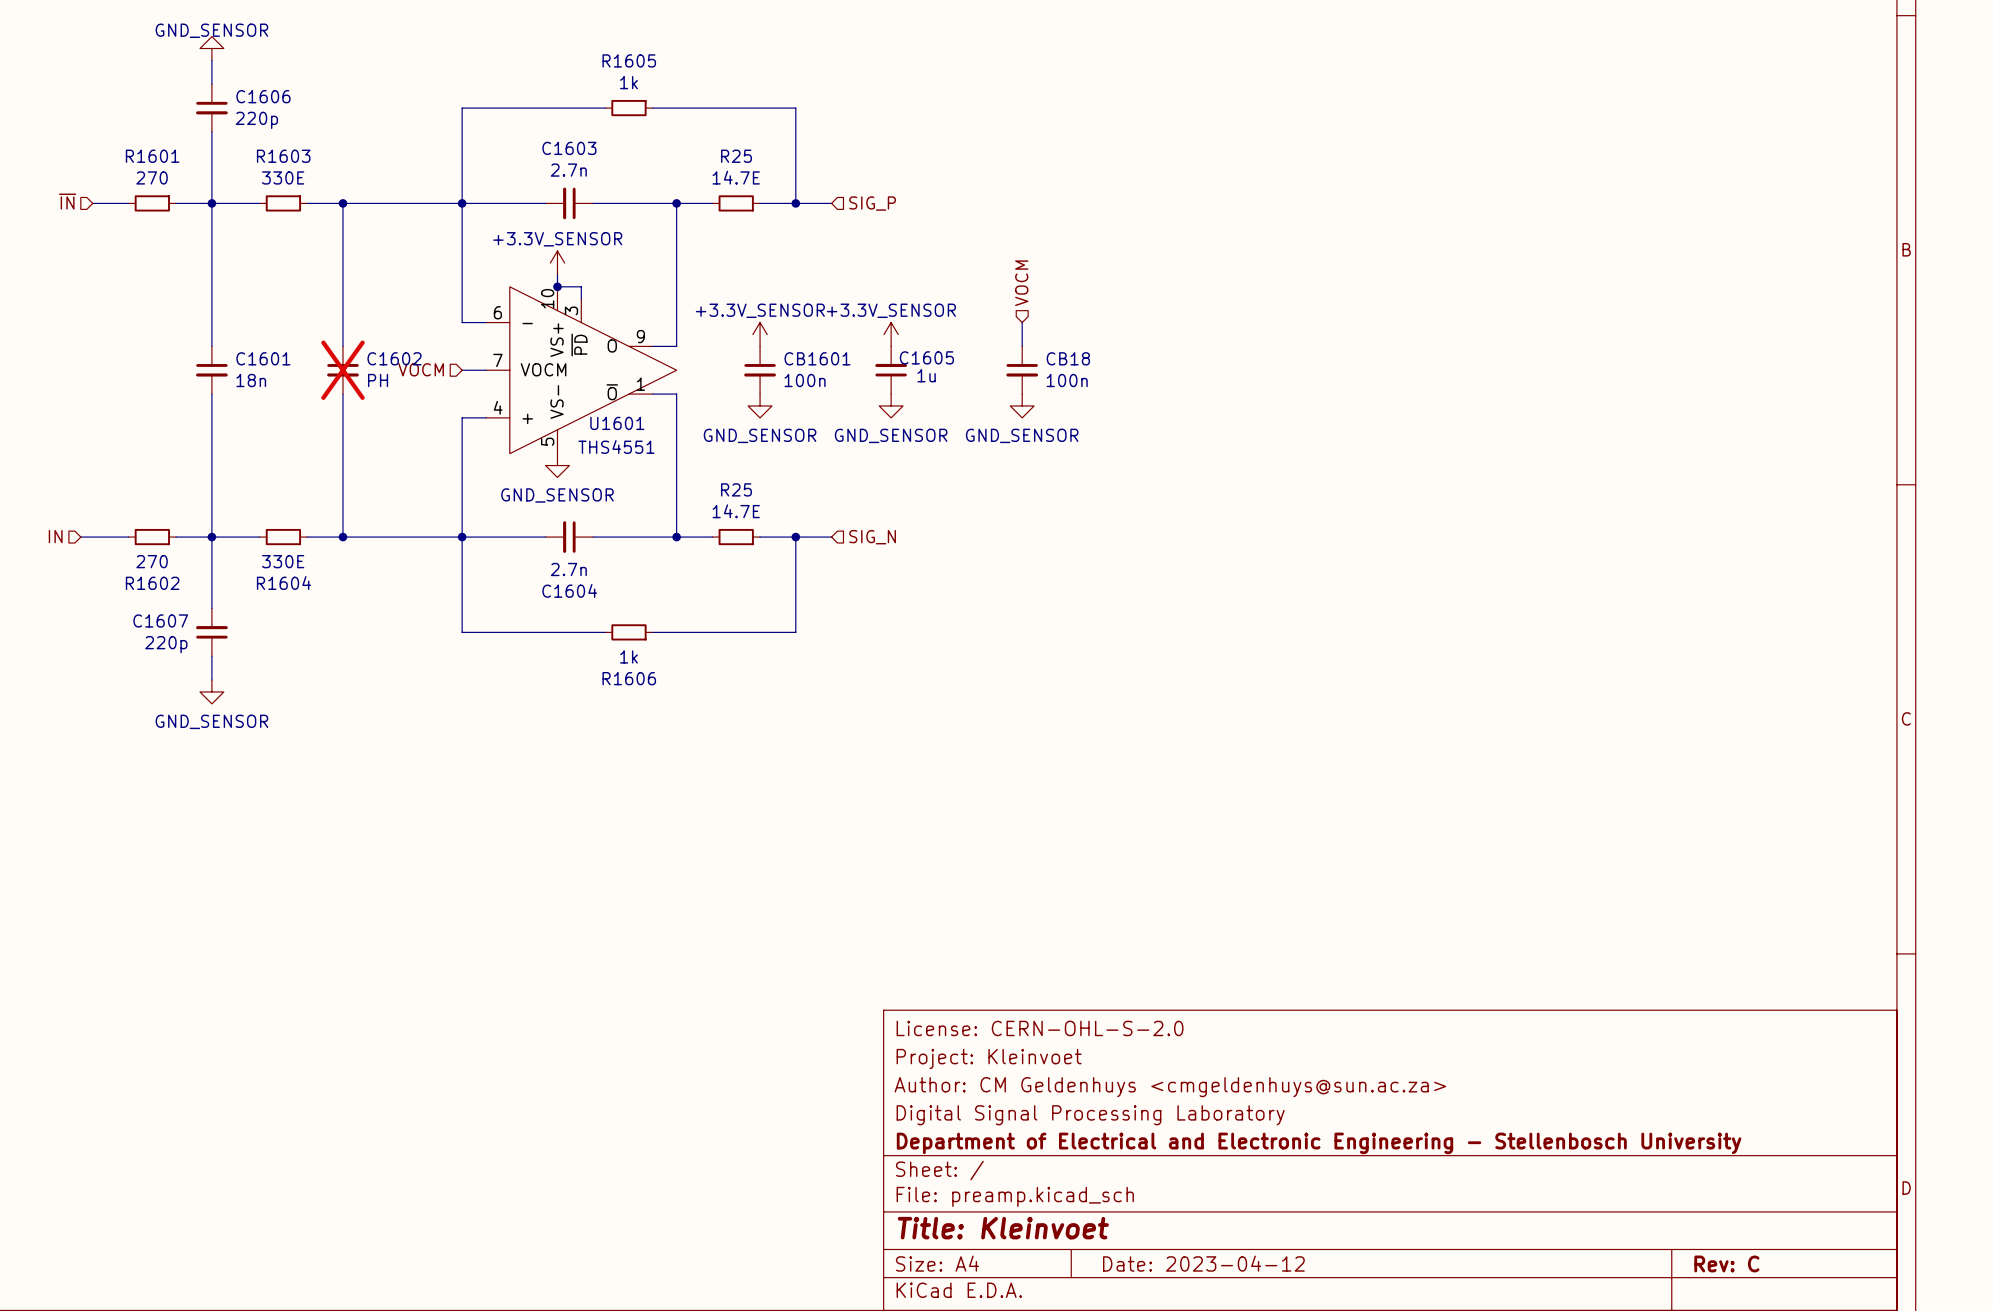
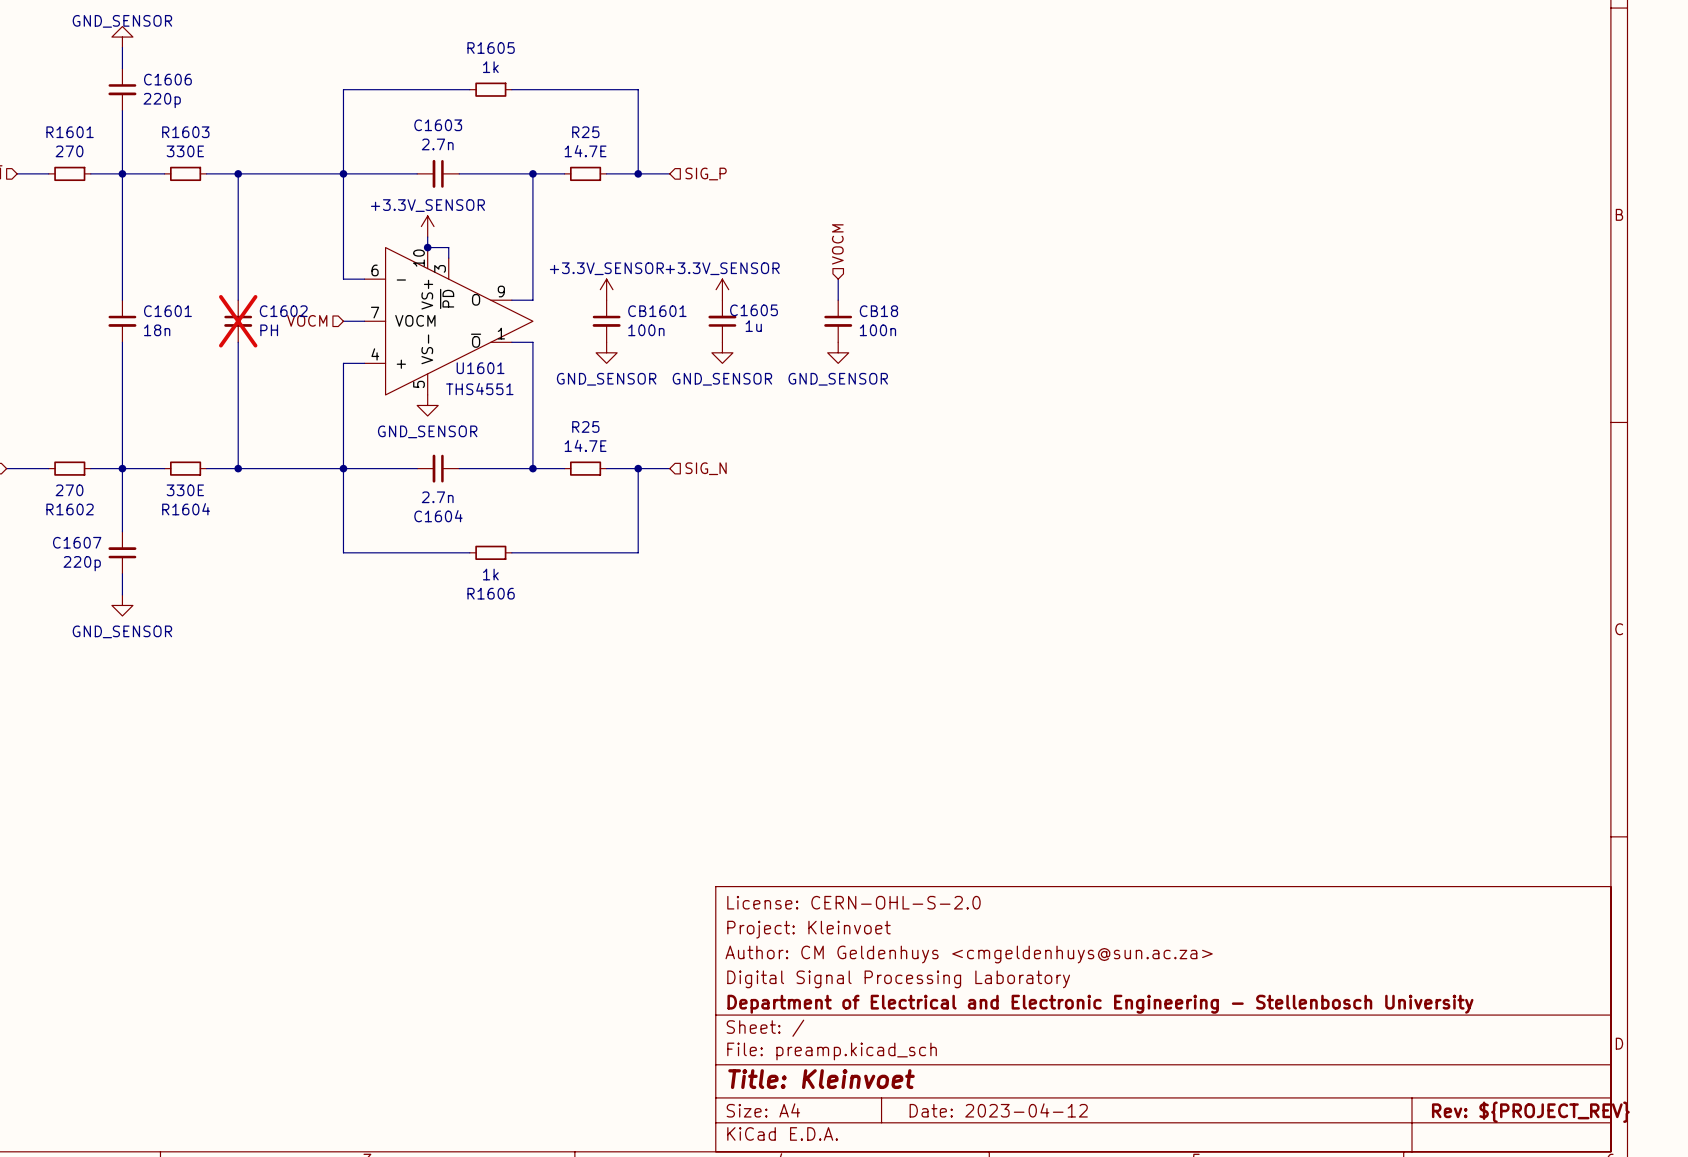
title block: Rev: C (1726, 1263) -> Rev: ${PROJECT_REV} (1530, 1112)

